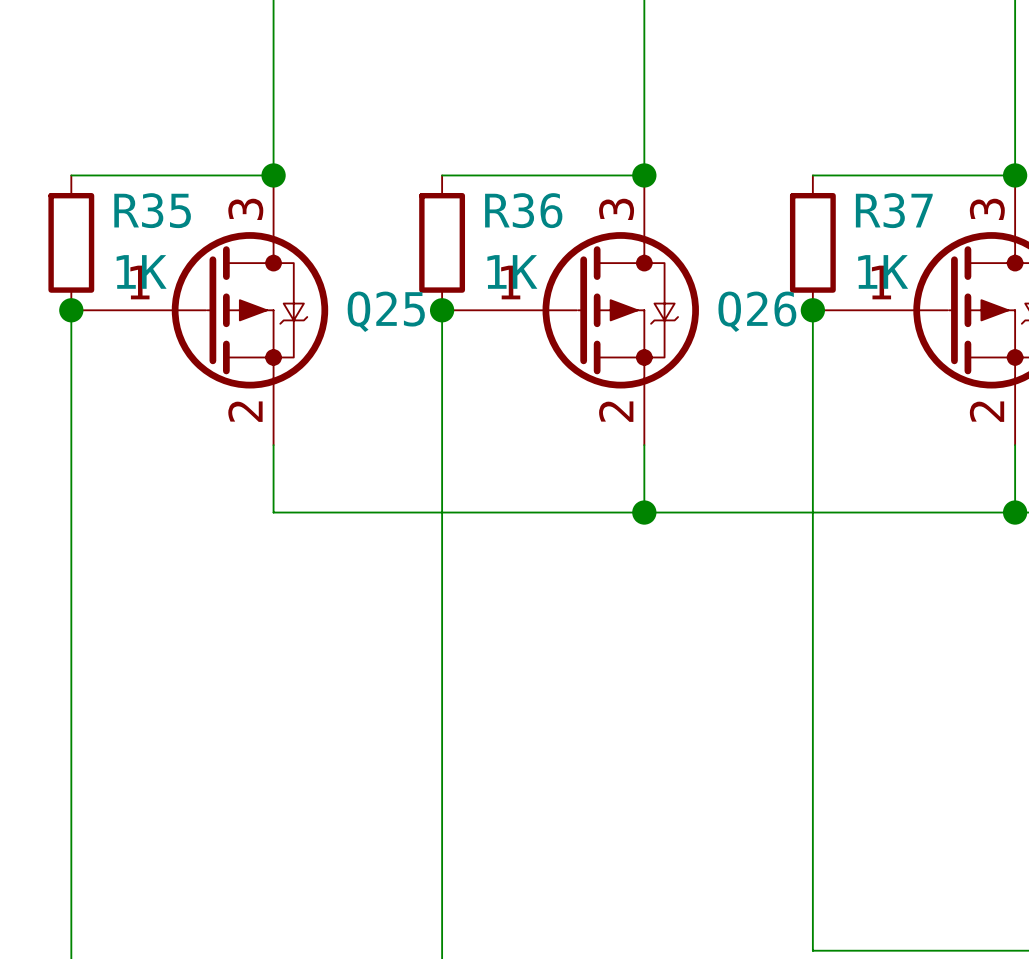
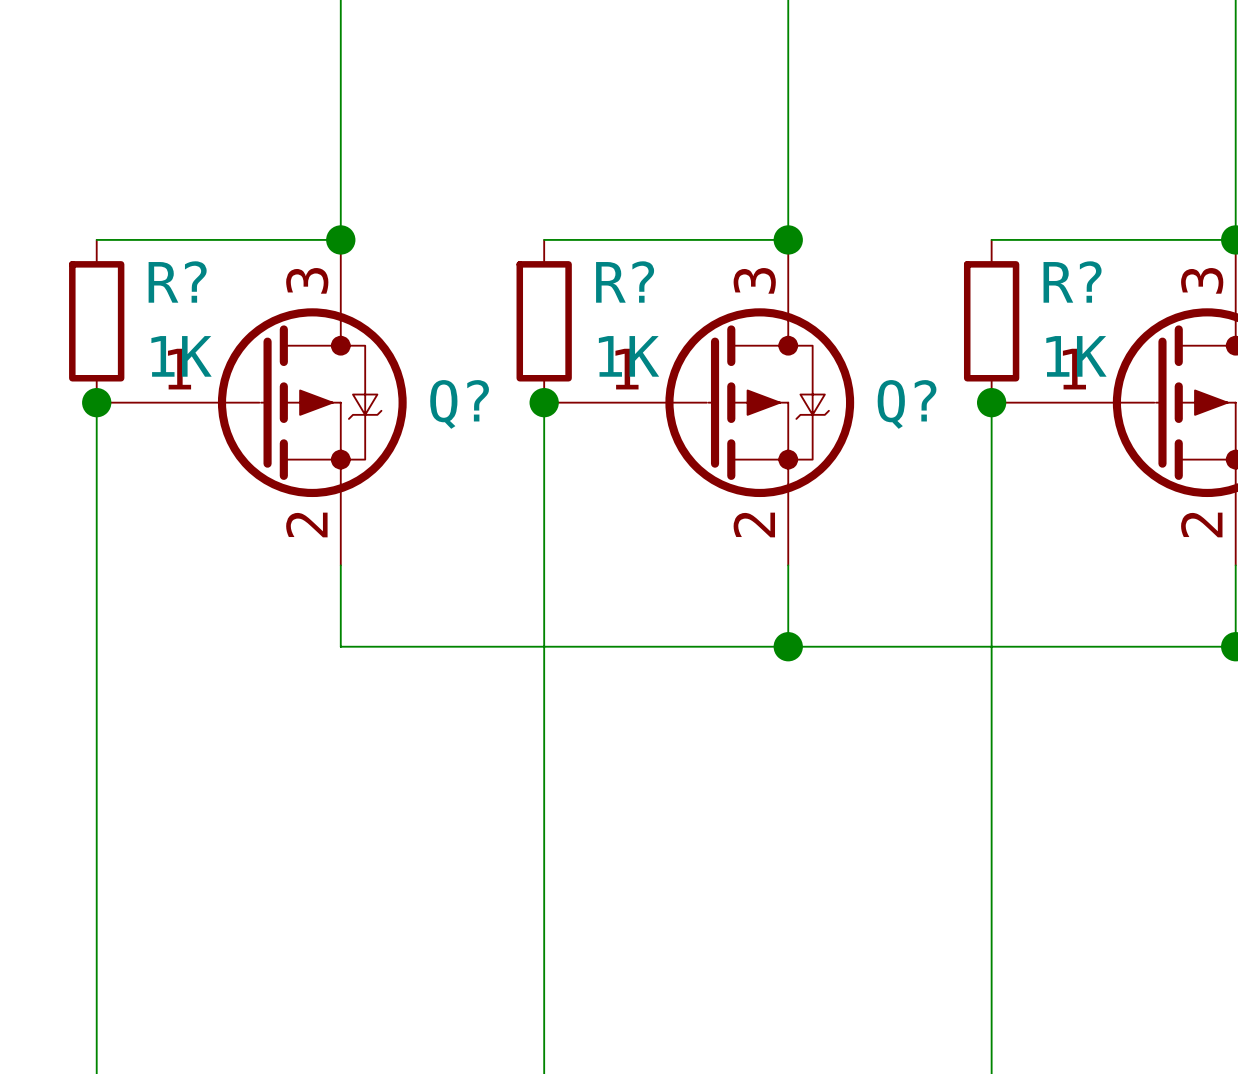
R35 name: R35 (152, 210) -> R? (177, 281)
R36 name: R36 (523, 210) -> R? (625, 281)
R37 name: R37 (894, 210) -> R? (1072, 281)
Q25 name: Q25 (386, 311) -> Q? (459, 404)
Q26 name: Q26 (757, 311) -> Q? (907, 404)

